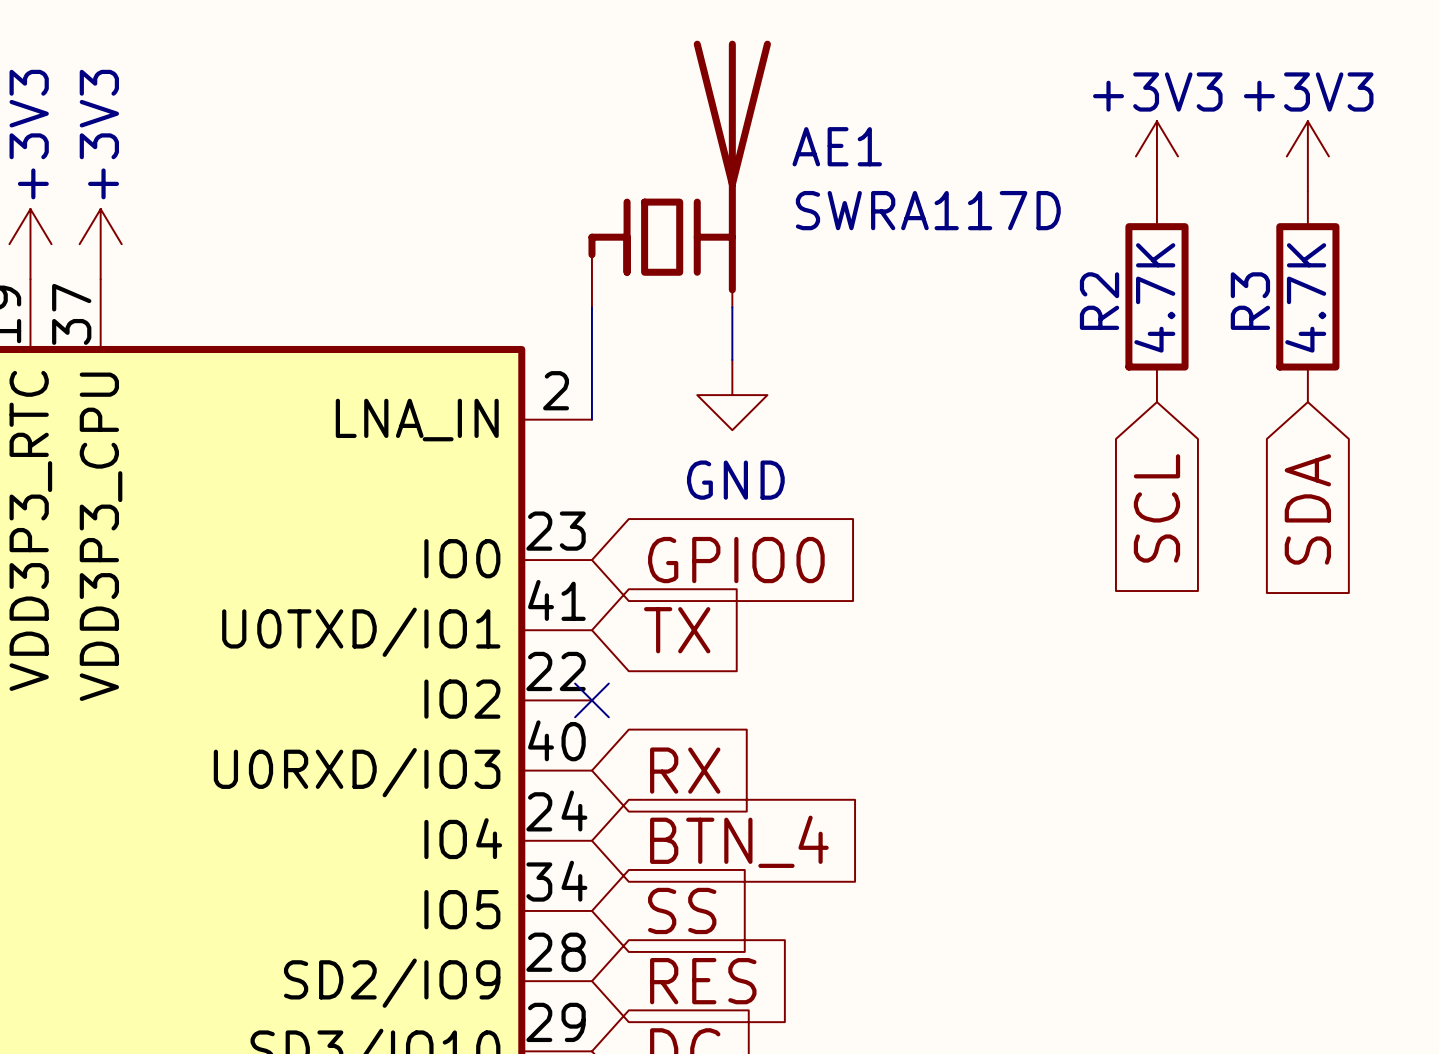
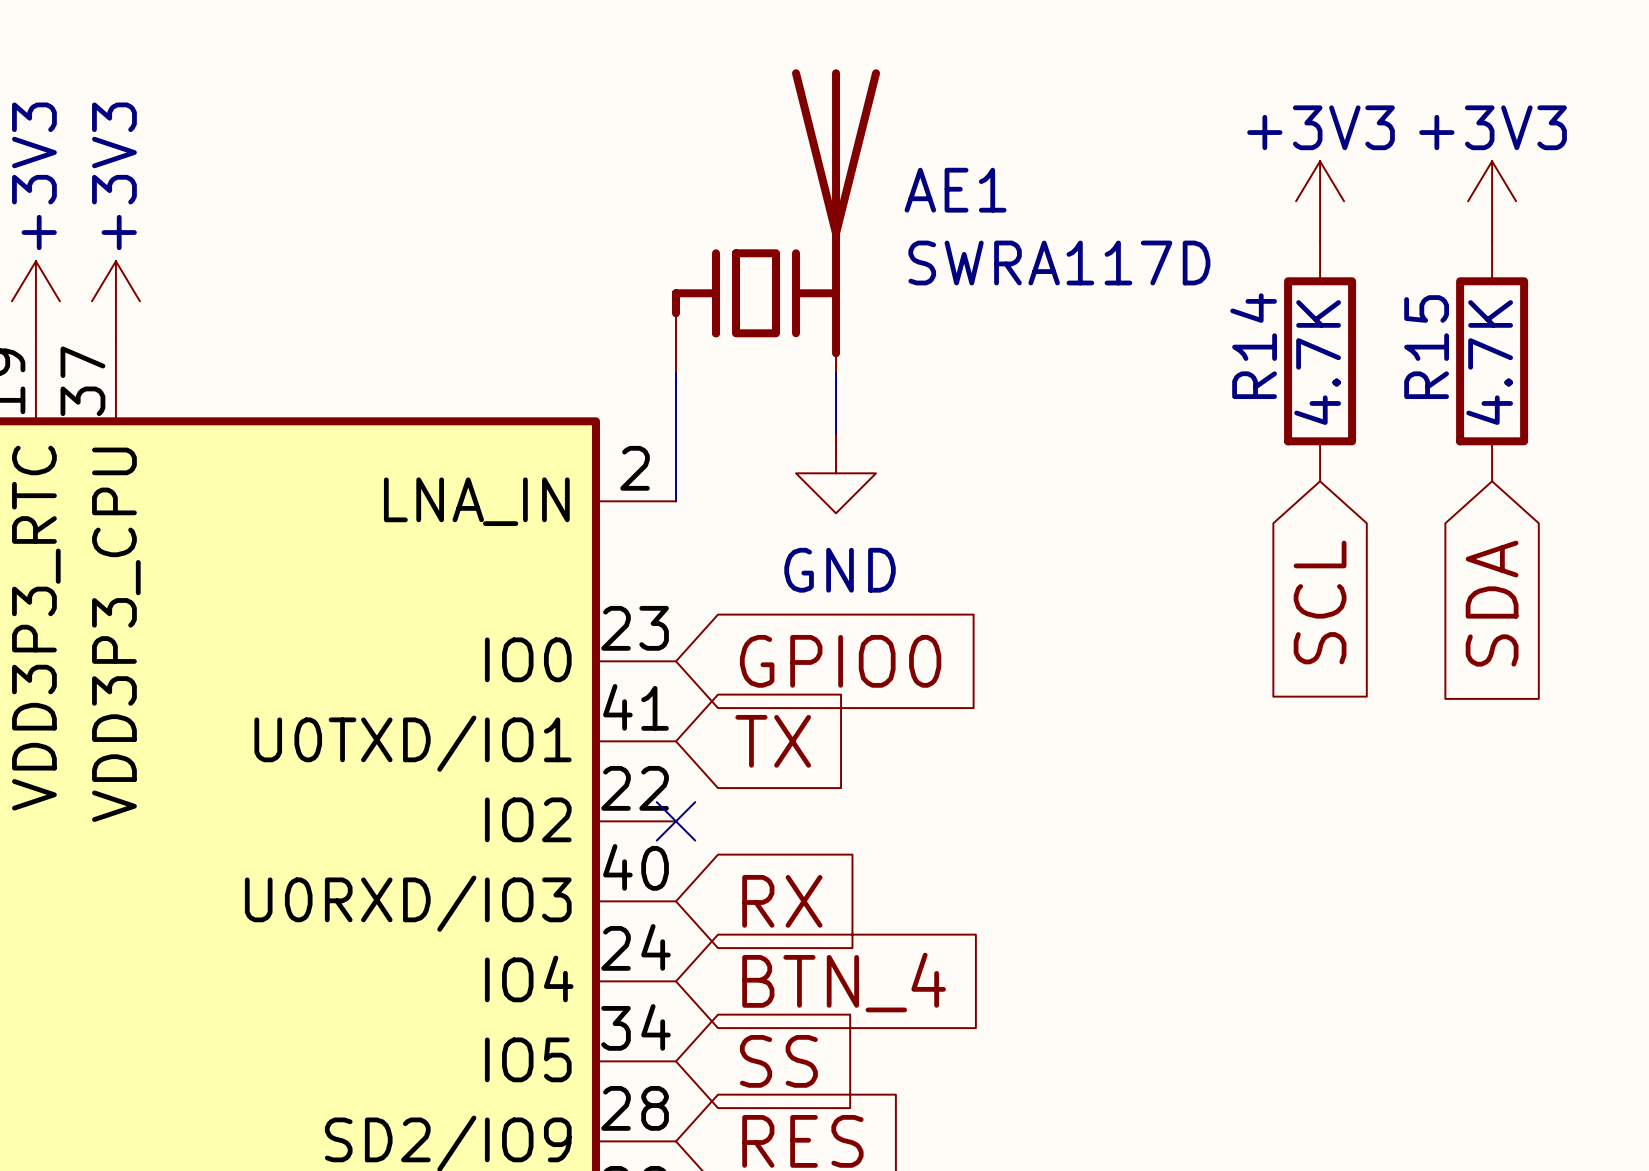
R2 name: R2 (1099, 301) -> R14 (1253, 346)
R3 name: R3 (1250, 301) -> R15 (1426, 347)

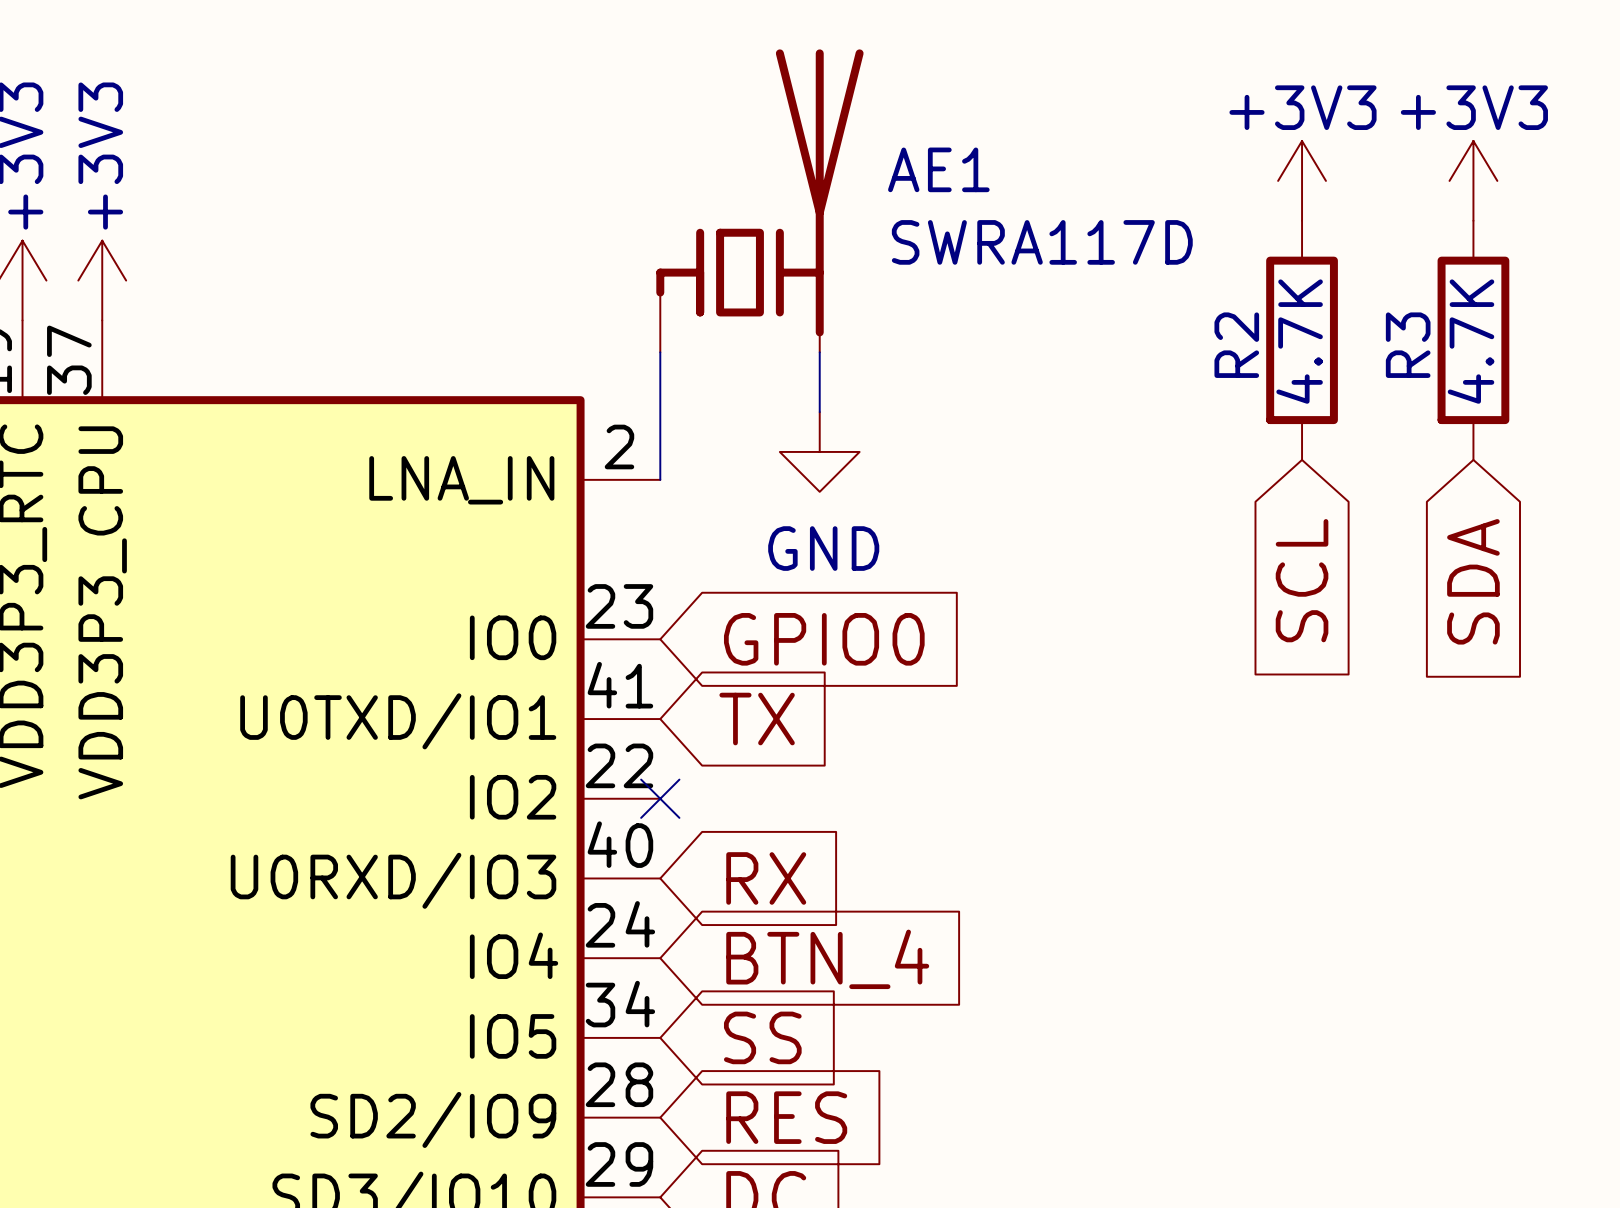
R14 name: R14 (1253, 346) -> R2 (1236, 345)
R15 name: R15 (1426, 347) -> R3 (1408, 345)

